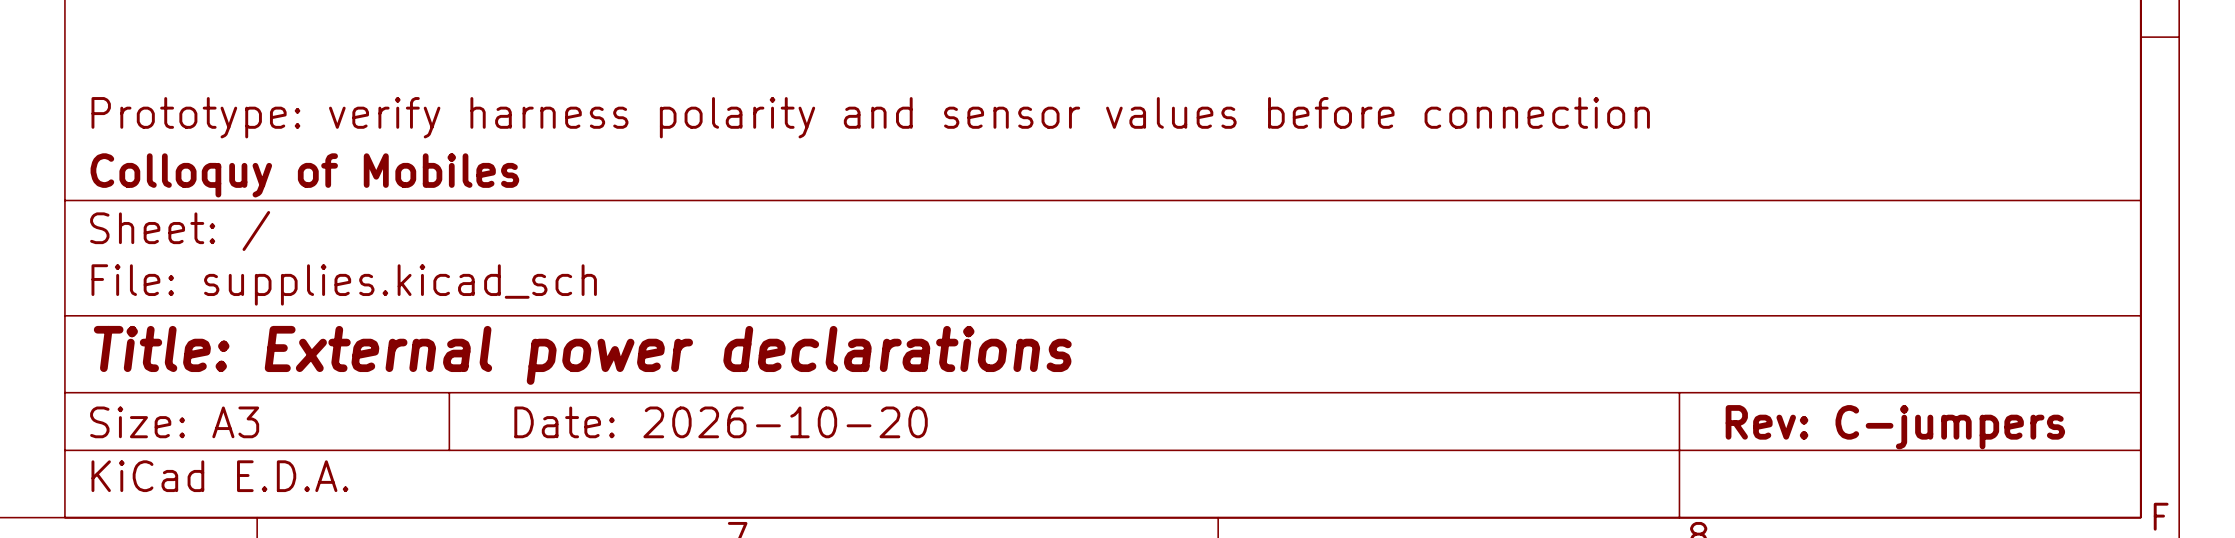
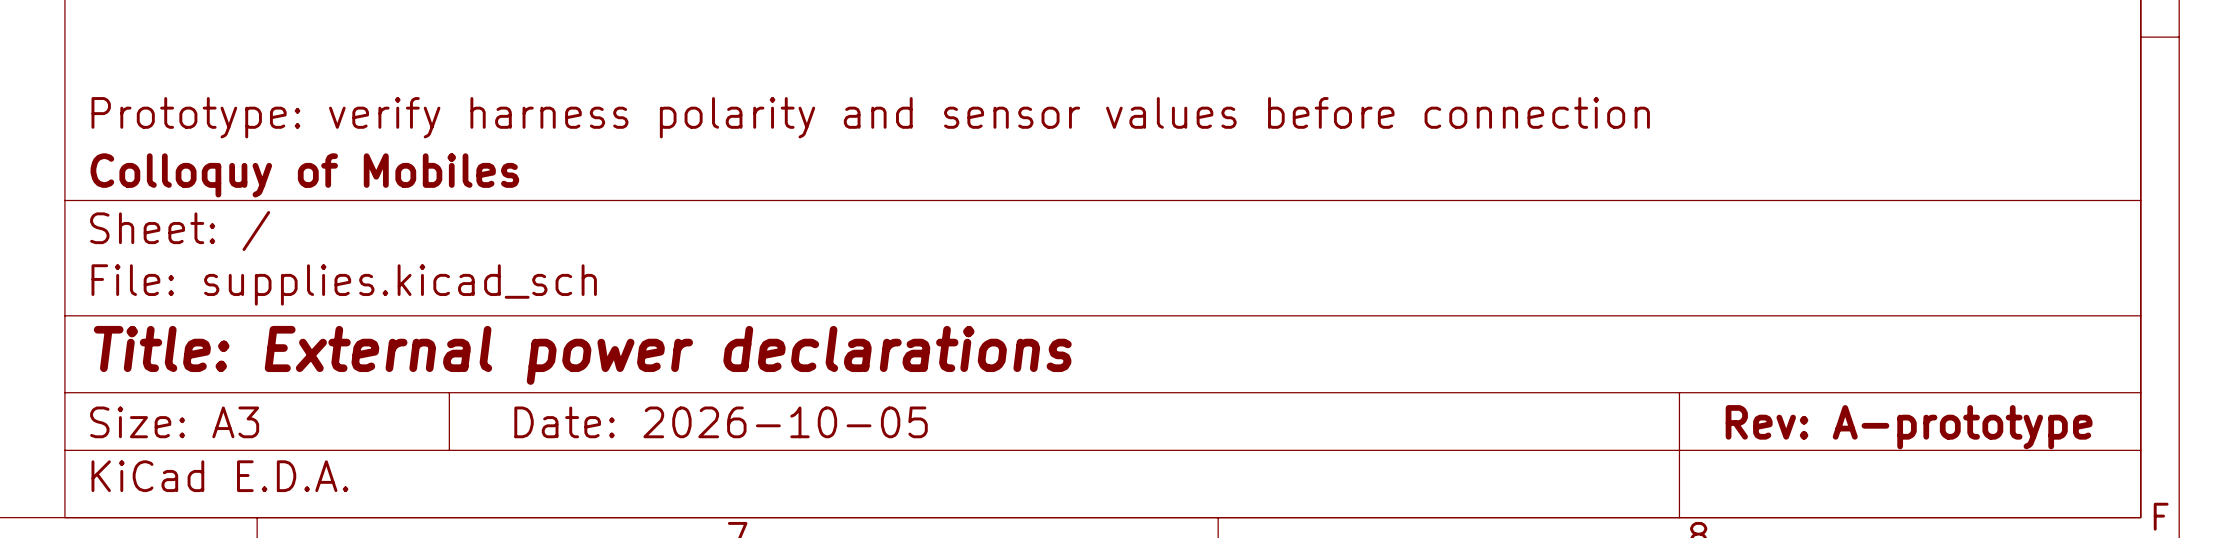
title block: Date: 2026-10-20 (721, 422) -> Date: 2026-10-05 (721, 422)
title block: Rev: C-jumpers (1895, 427) -> Rev: A-prototype (1909, 427)

